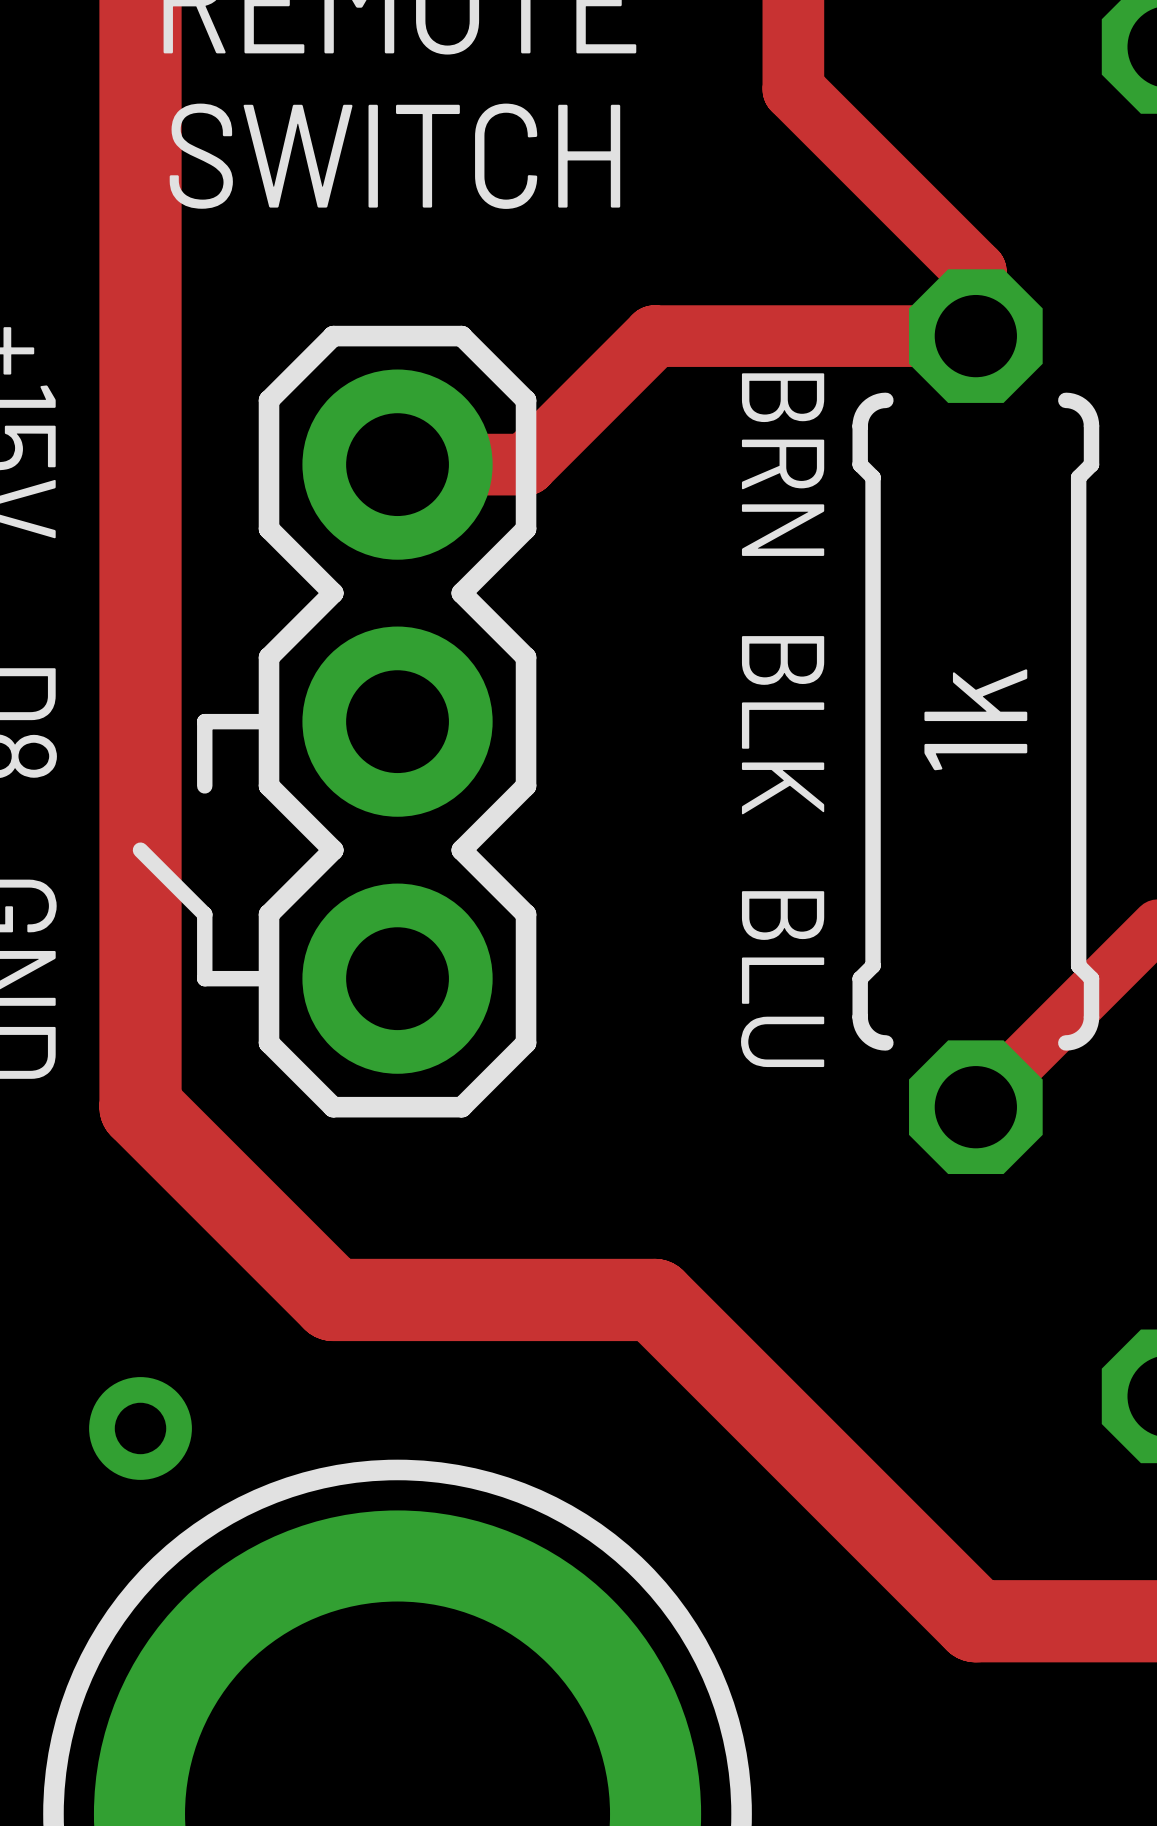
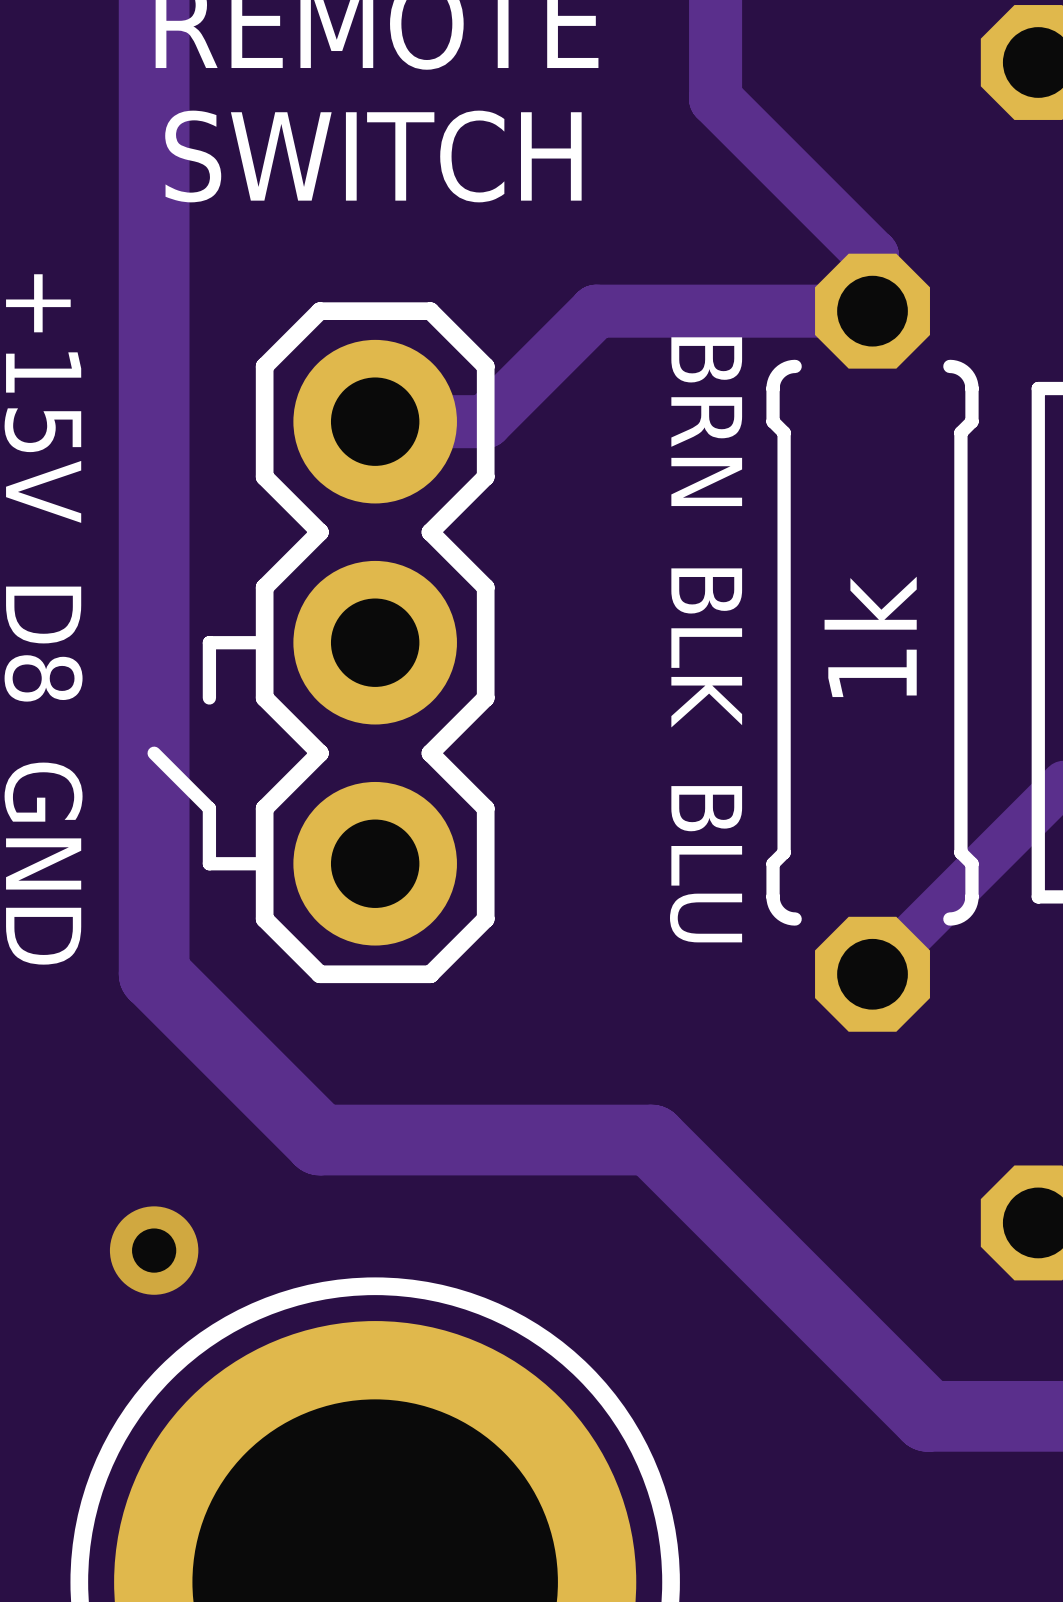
track: (654, 1299) (975, 1621) (1040, 1621) -> (596, 1140) (651, 1140) (927, 1416)

